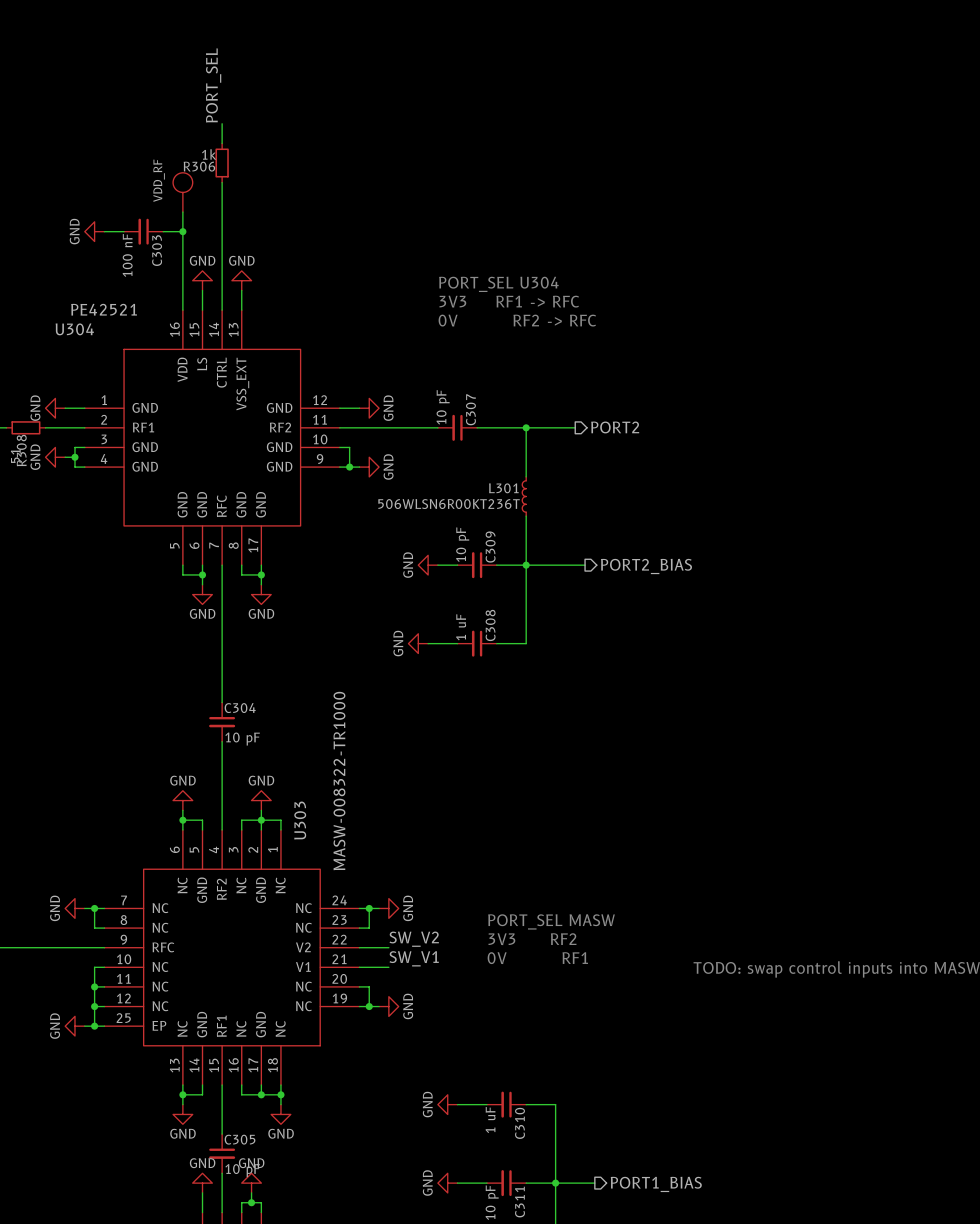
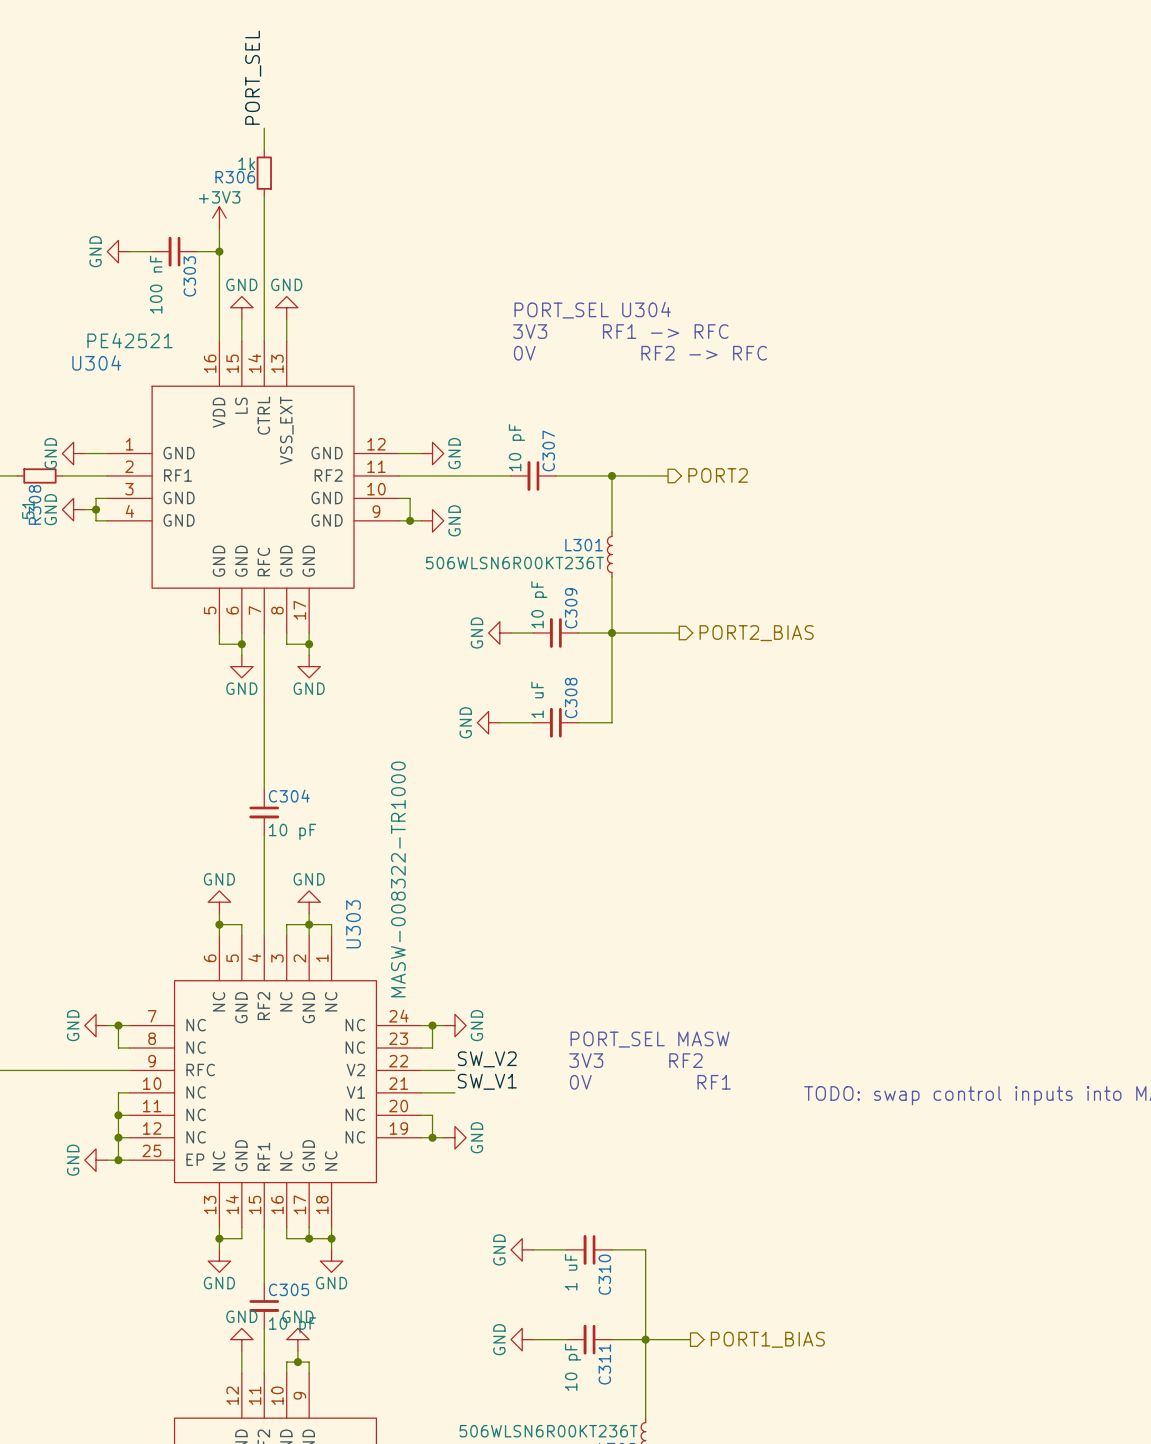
power symbol: VDD_RF (182, 192) -> none
power symbol: none -> +3V3 (219, 217)

